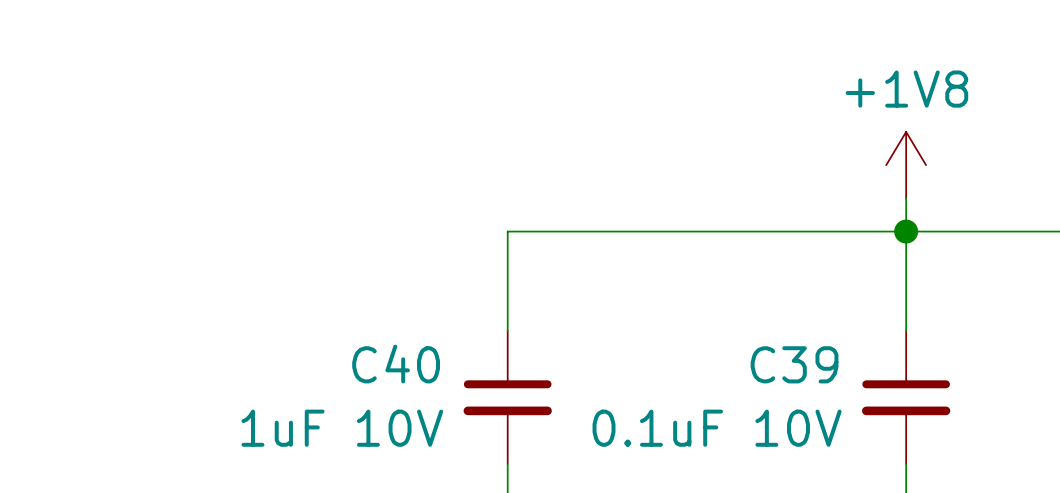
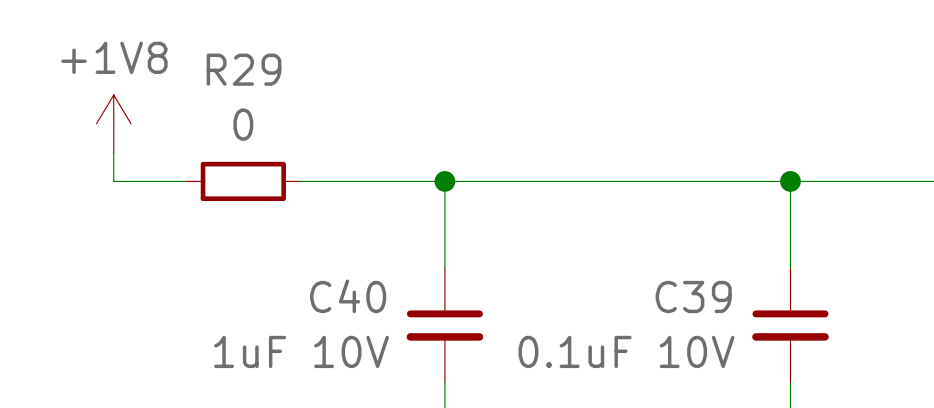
power symbol: none -> +1V8 (113, 123)
power symbol: +1V8 (906, 165) -> none
wire: none -> (113, 152) (113, 181) (185, 181)
wire: (906, 198) (906, 231) -> none
R29: none -> 0 (243, 181)
wire: none -> (300, 181) (444, 181)
junction: none -> (444, 181)

